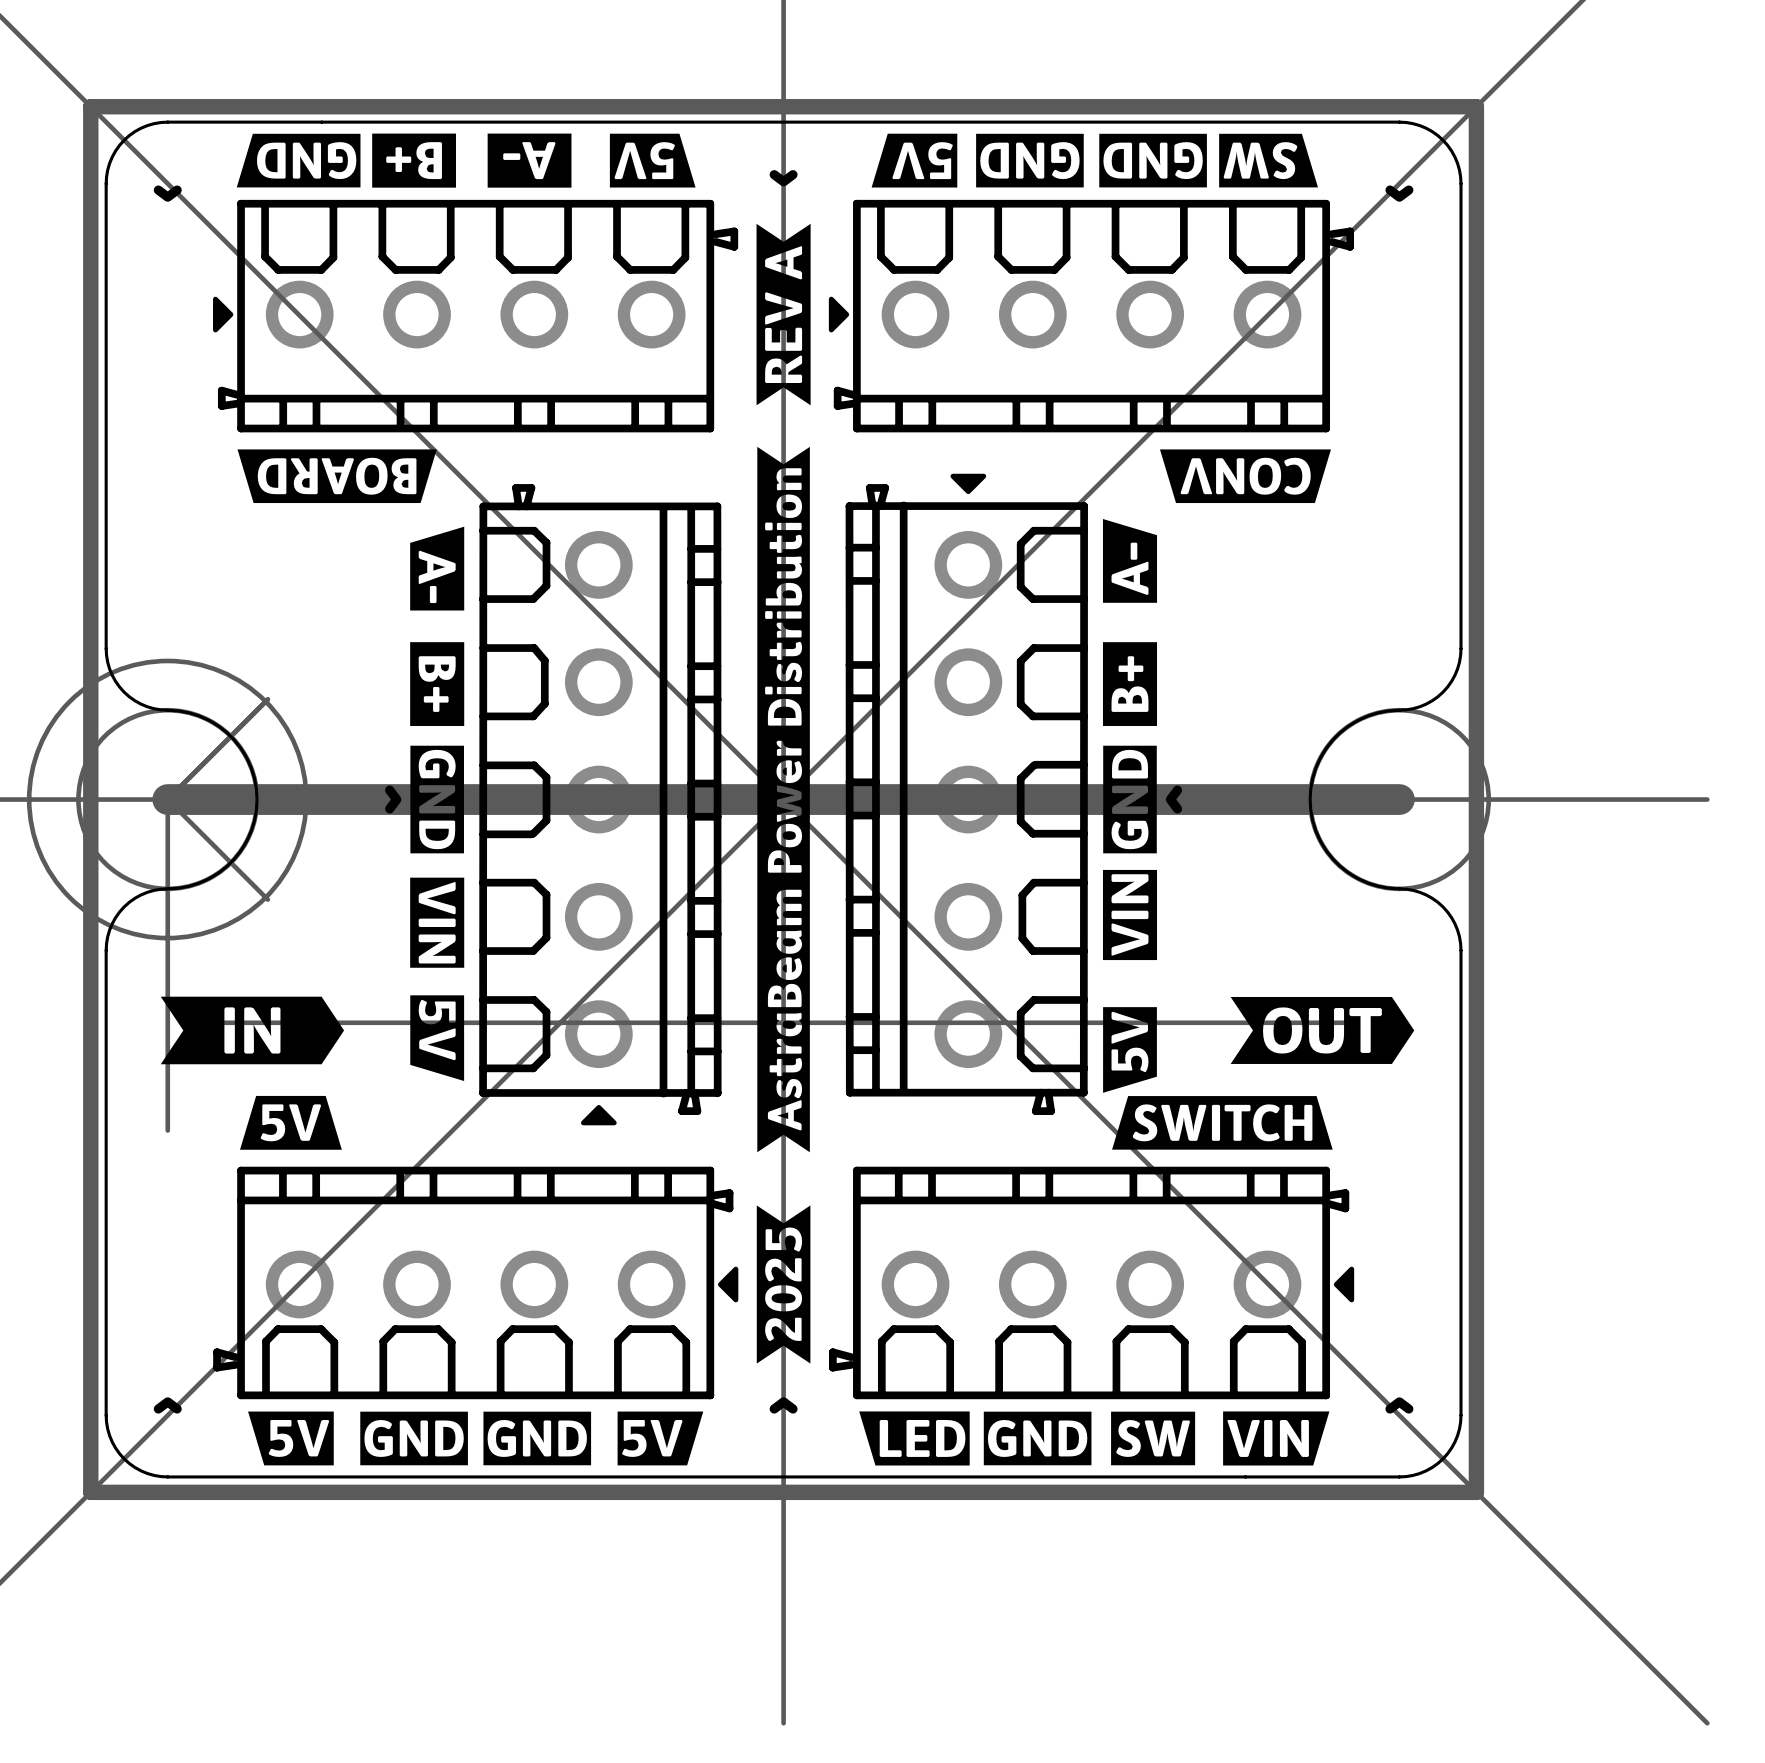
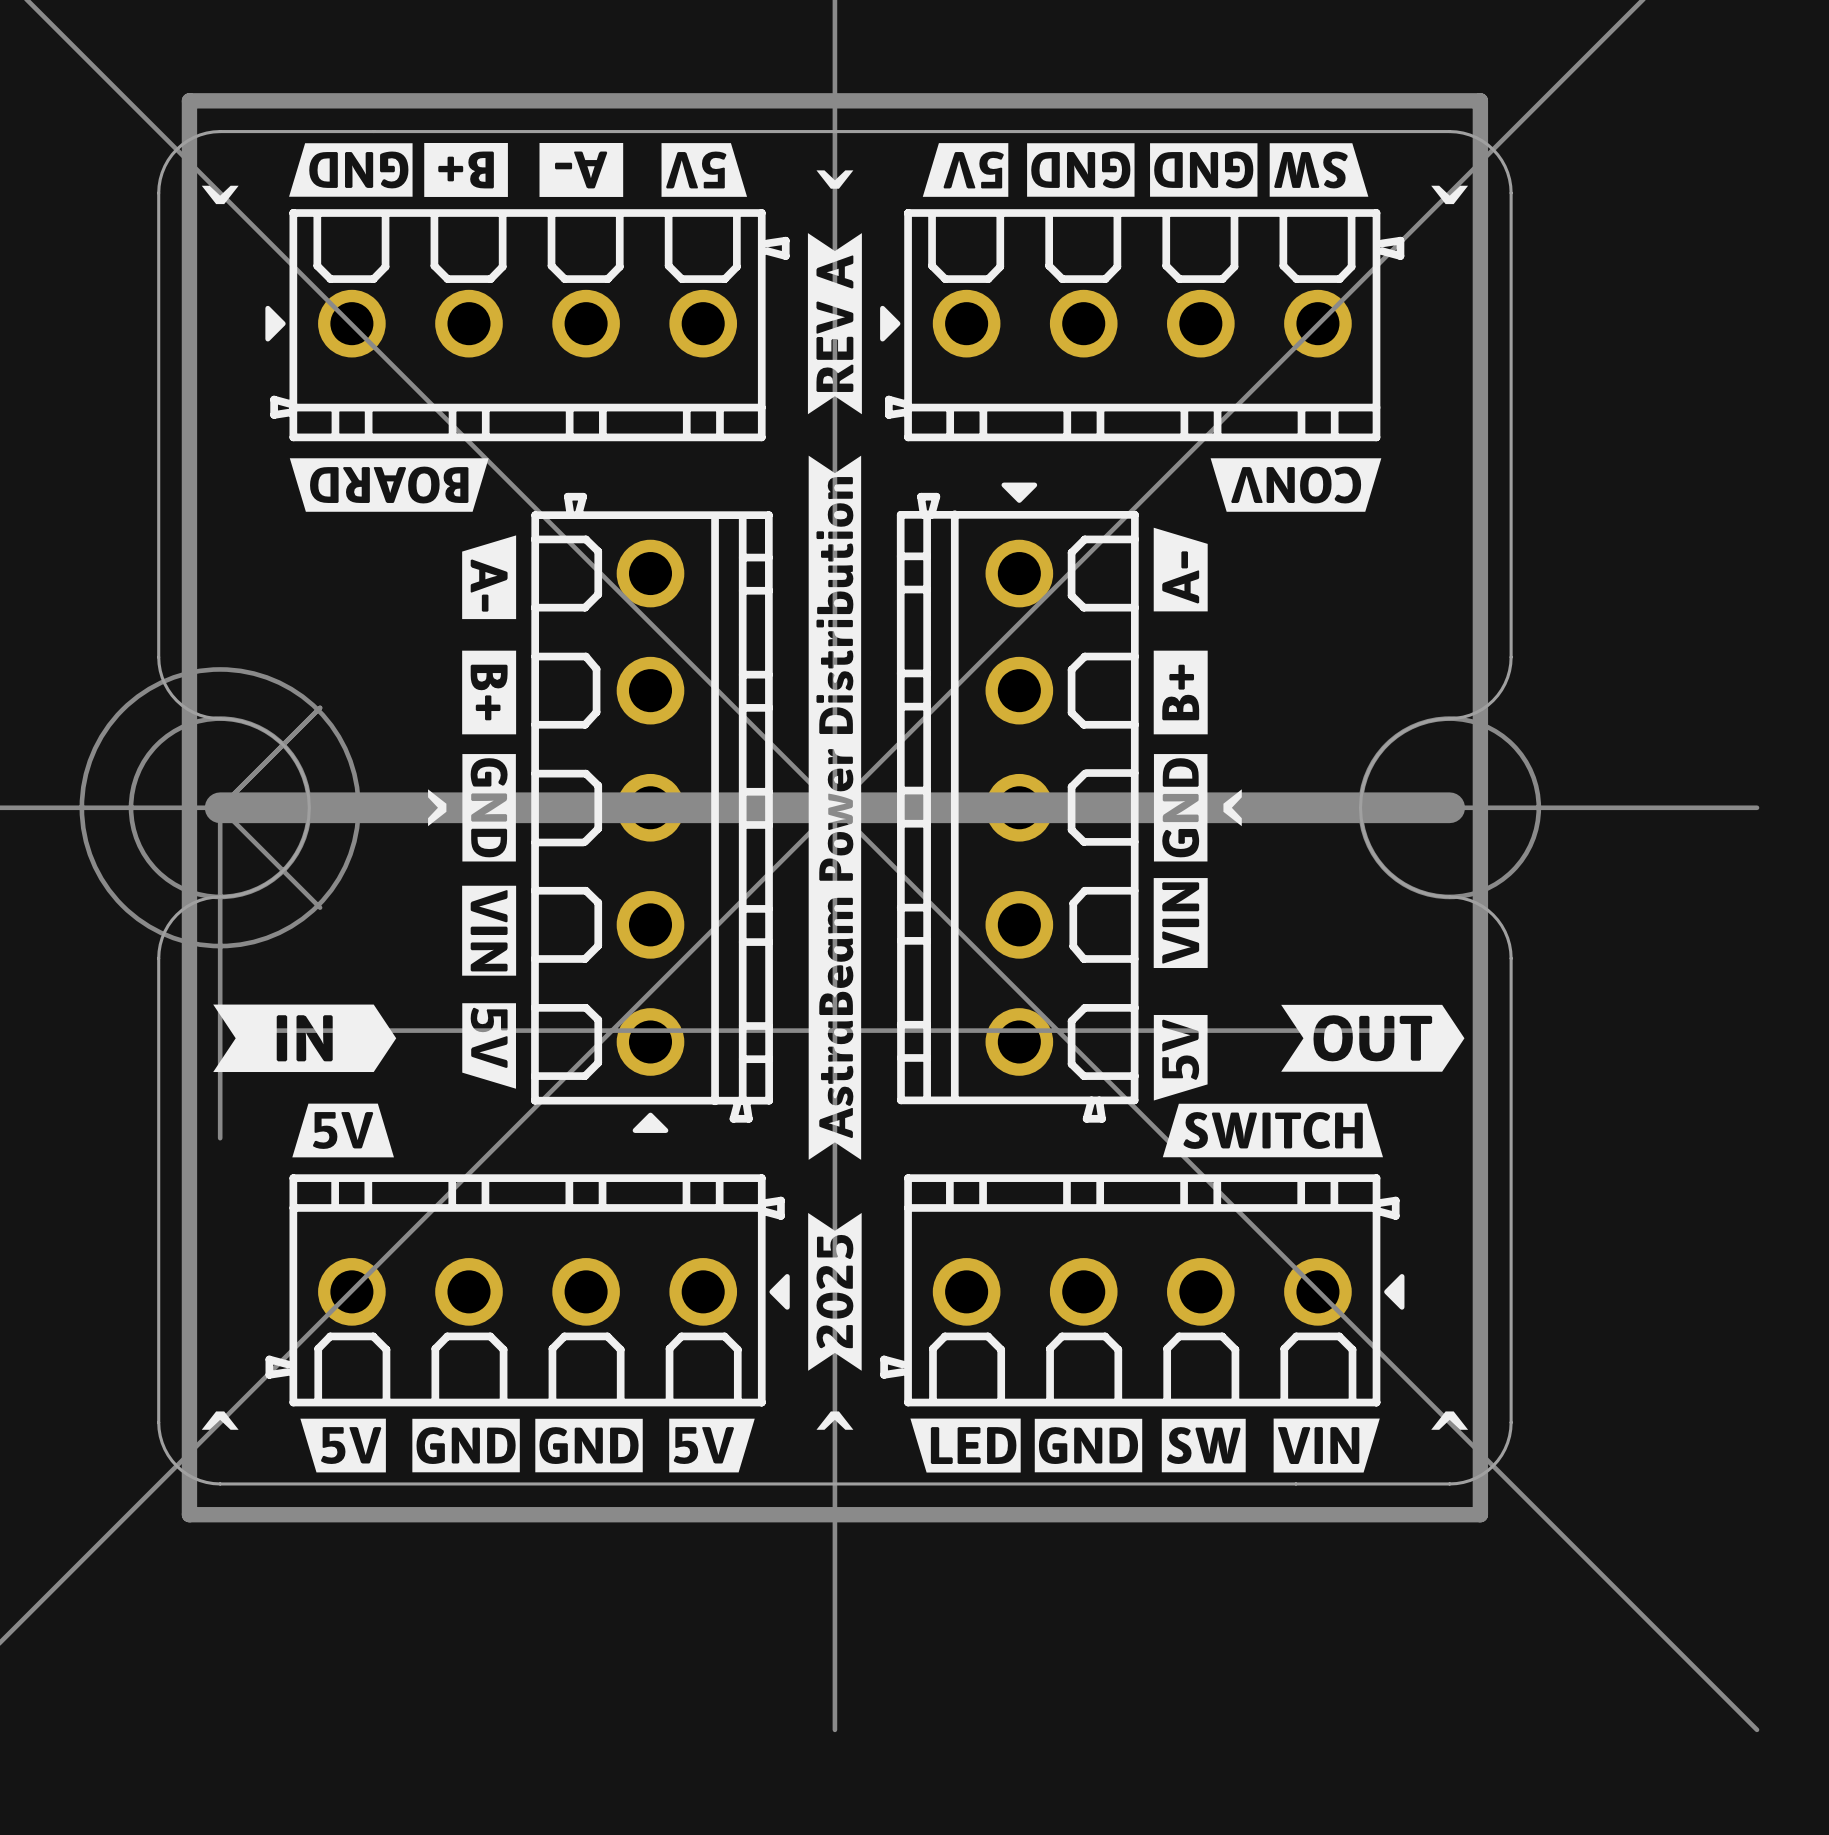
line: (90, 106) (90, 1492) (1476, 1492) (1476, 106) (90, 106) -> (189, 100) (189, 1514) (1480, 1514) (1480, 100) (189, 100)

